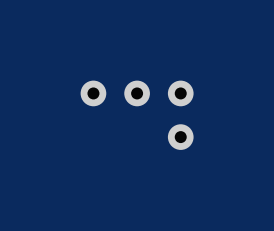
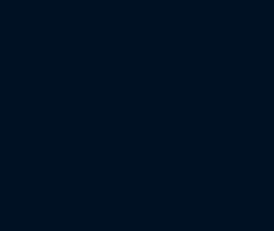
part: (93, 93) -> none
part: (137, 93) -> none
part: (180, 93) -> none
part: (180, 137) -> none

